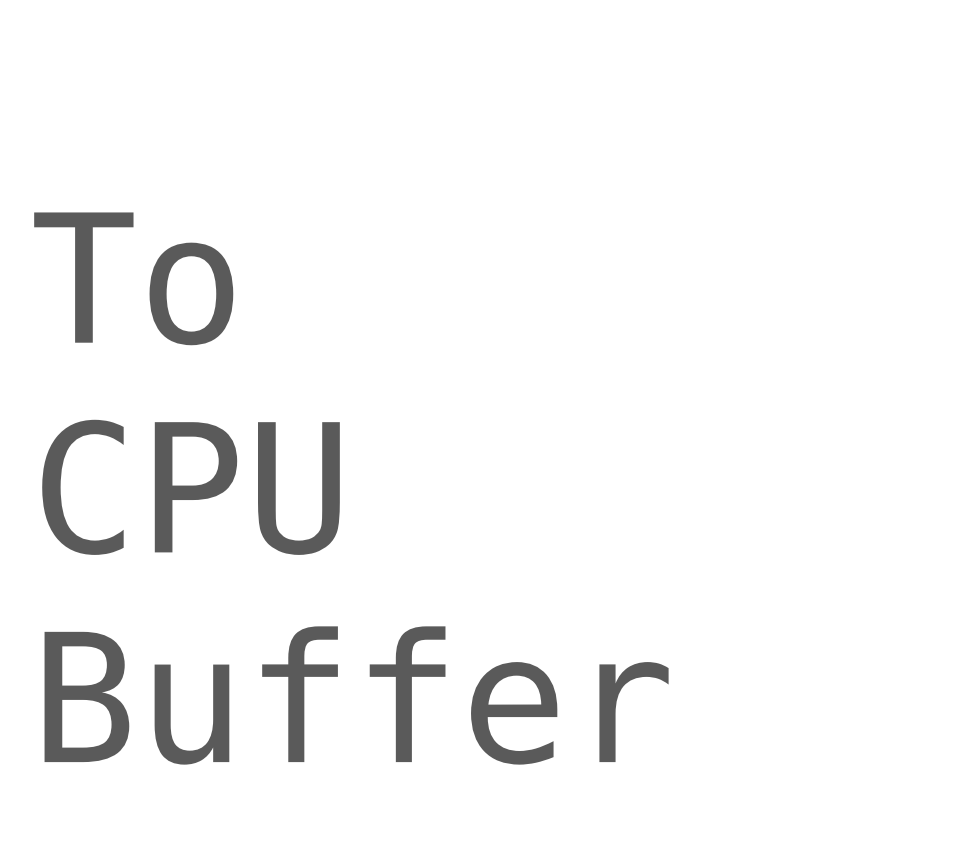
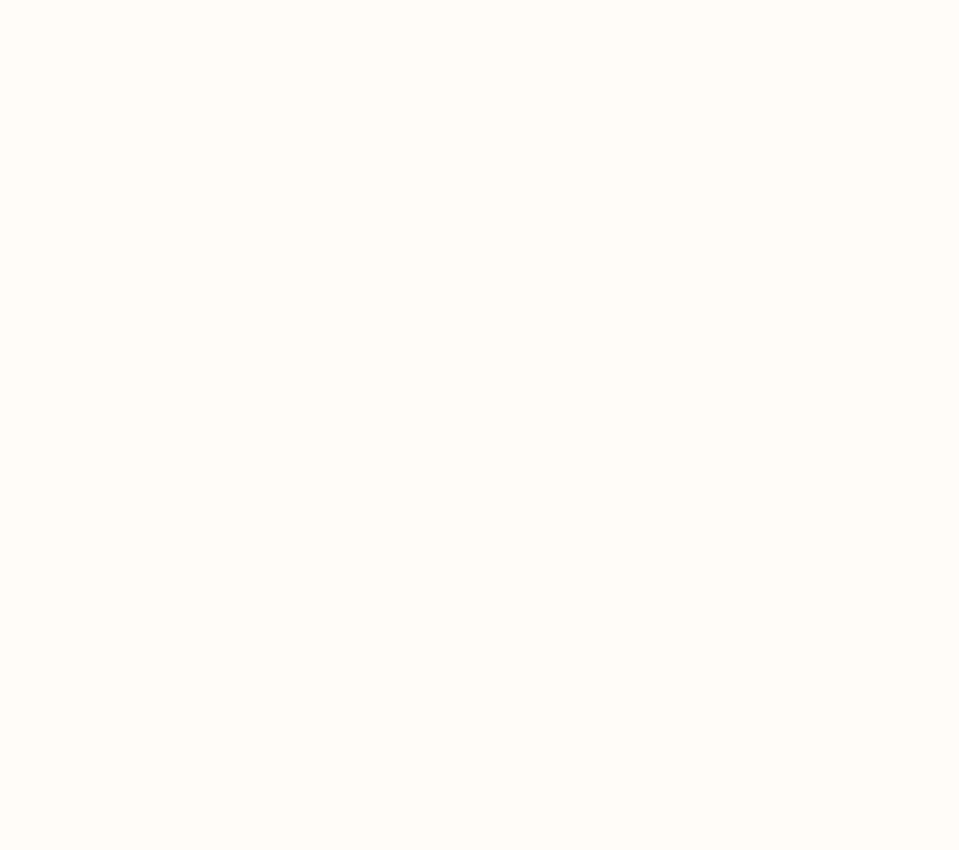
text: To (133, 278) -> none
text: CPU (191, 487) -> none
text: Buffer (356, 695) -> none

